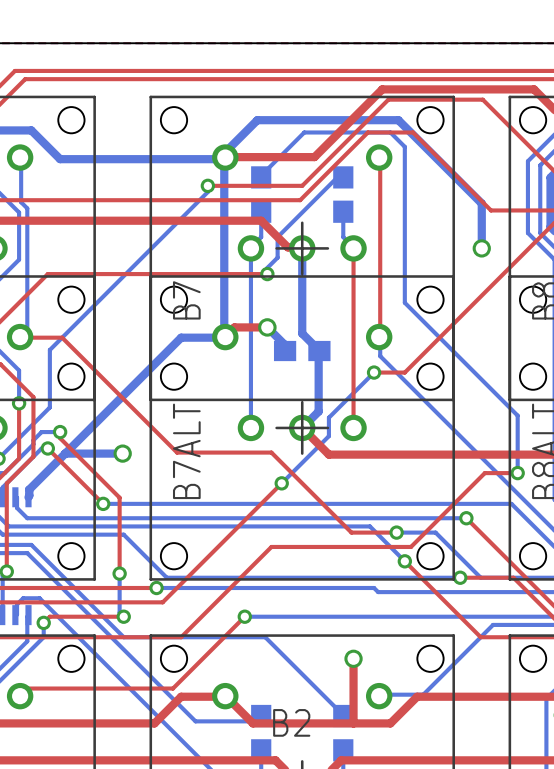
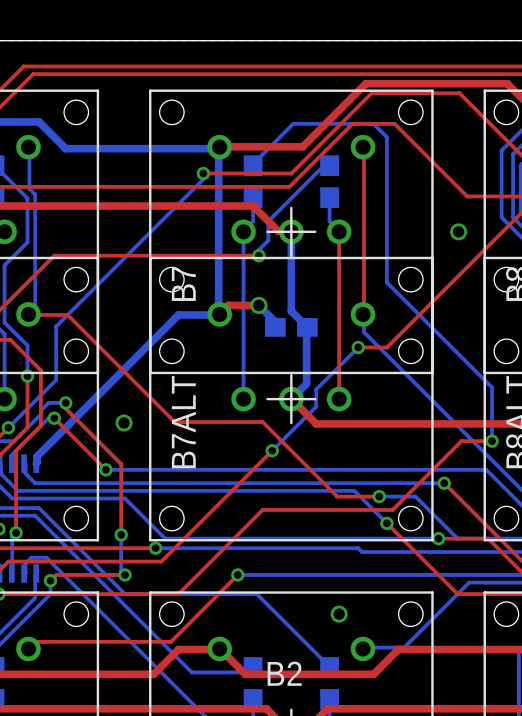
bottom track: (225, 157) (225, 152) (257, 120) (398, 120) (481, 203) (481, 248) -> none
bottom track: (65, 453) (122, 453) -> none
top track: (353, 658) (353, 723) -> none

